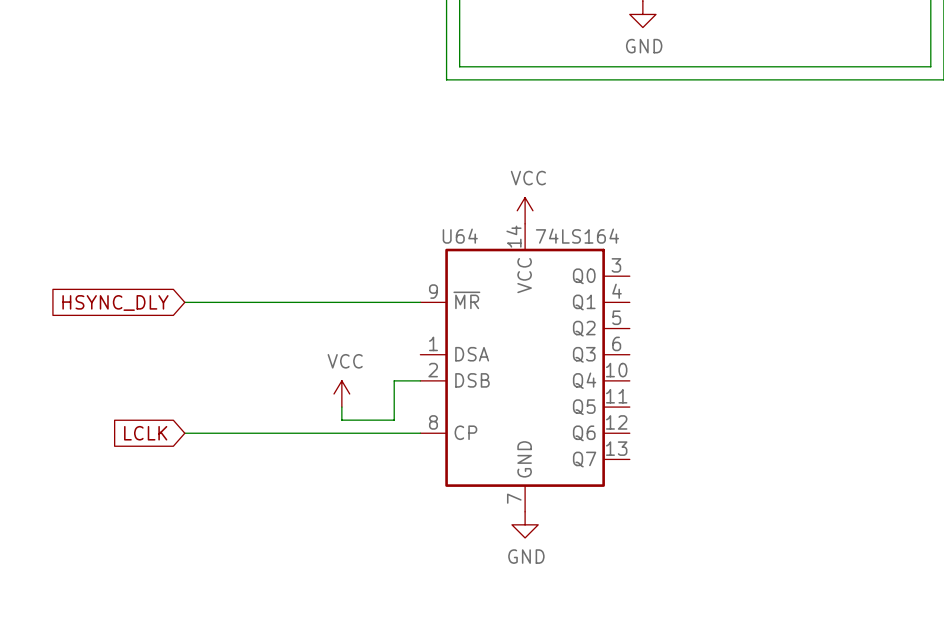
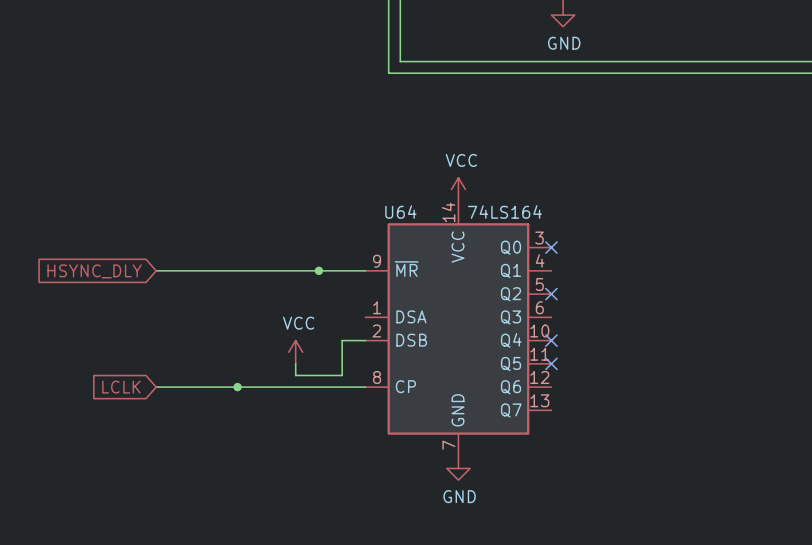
no-connect mark: none -> (551, 247)
junction: none -> (318, 270)
no-connect mark: none -> (551, 294)
no-connect mark: none -> (551, 340)
no-connect mark: none -> (551, 363)
junction: none -> (237, 387)

